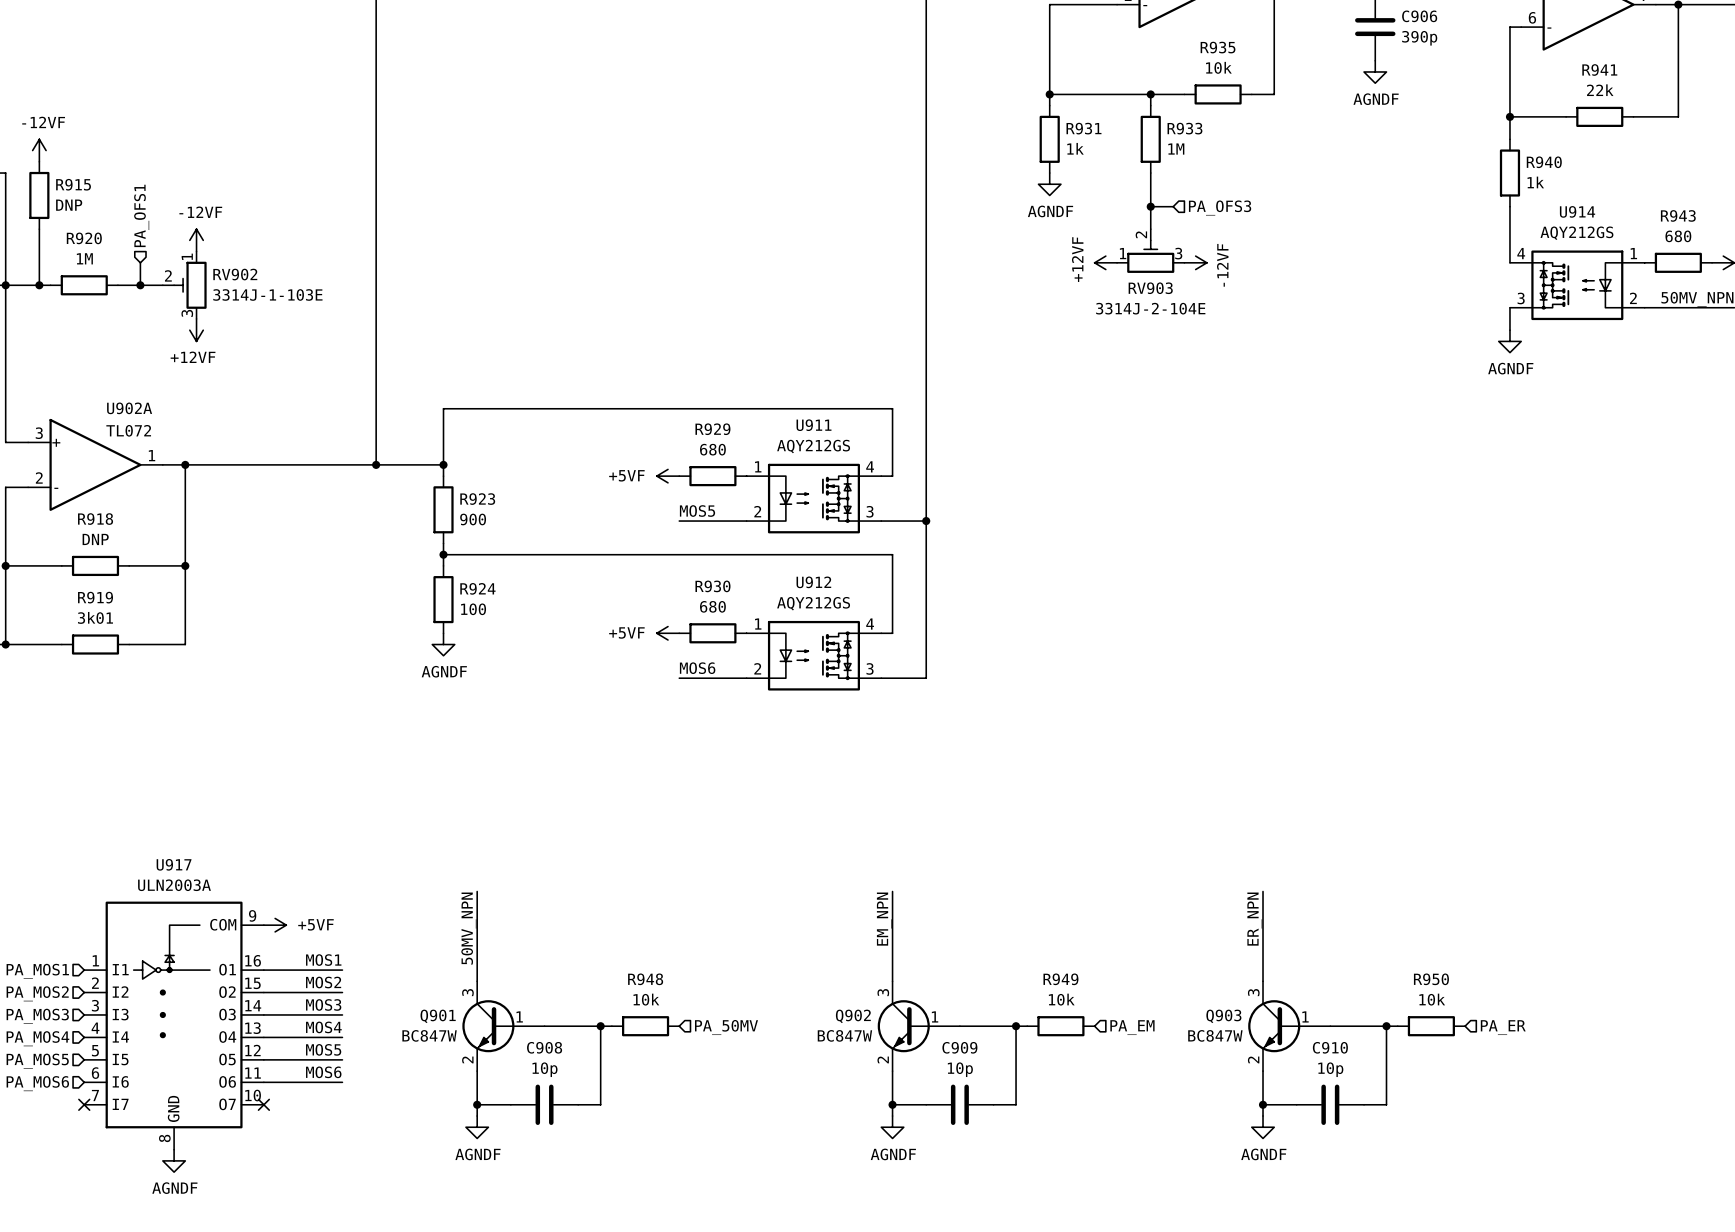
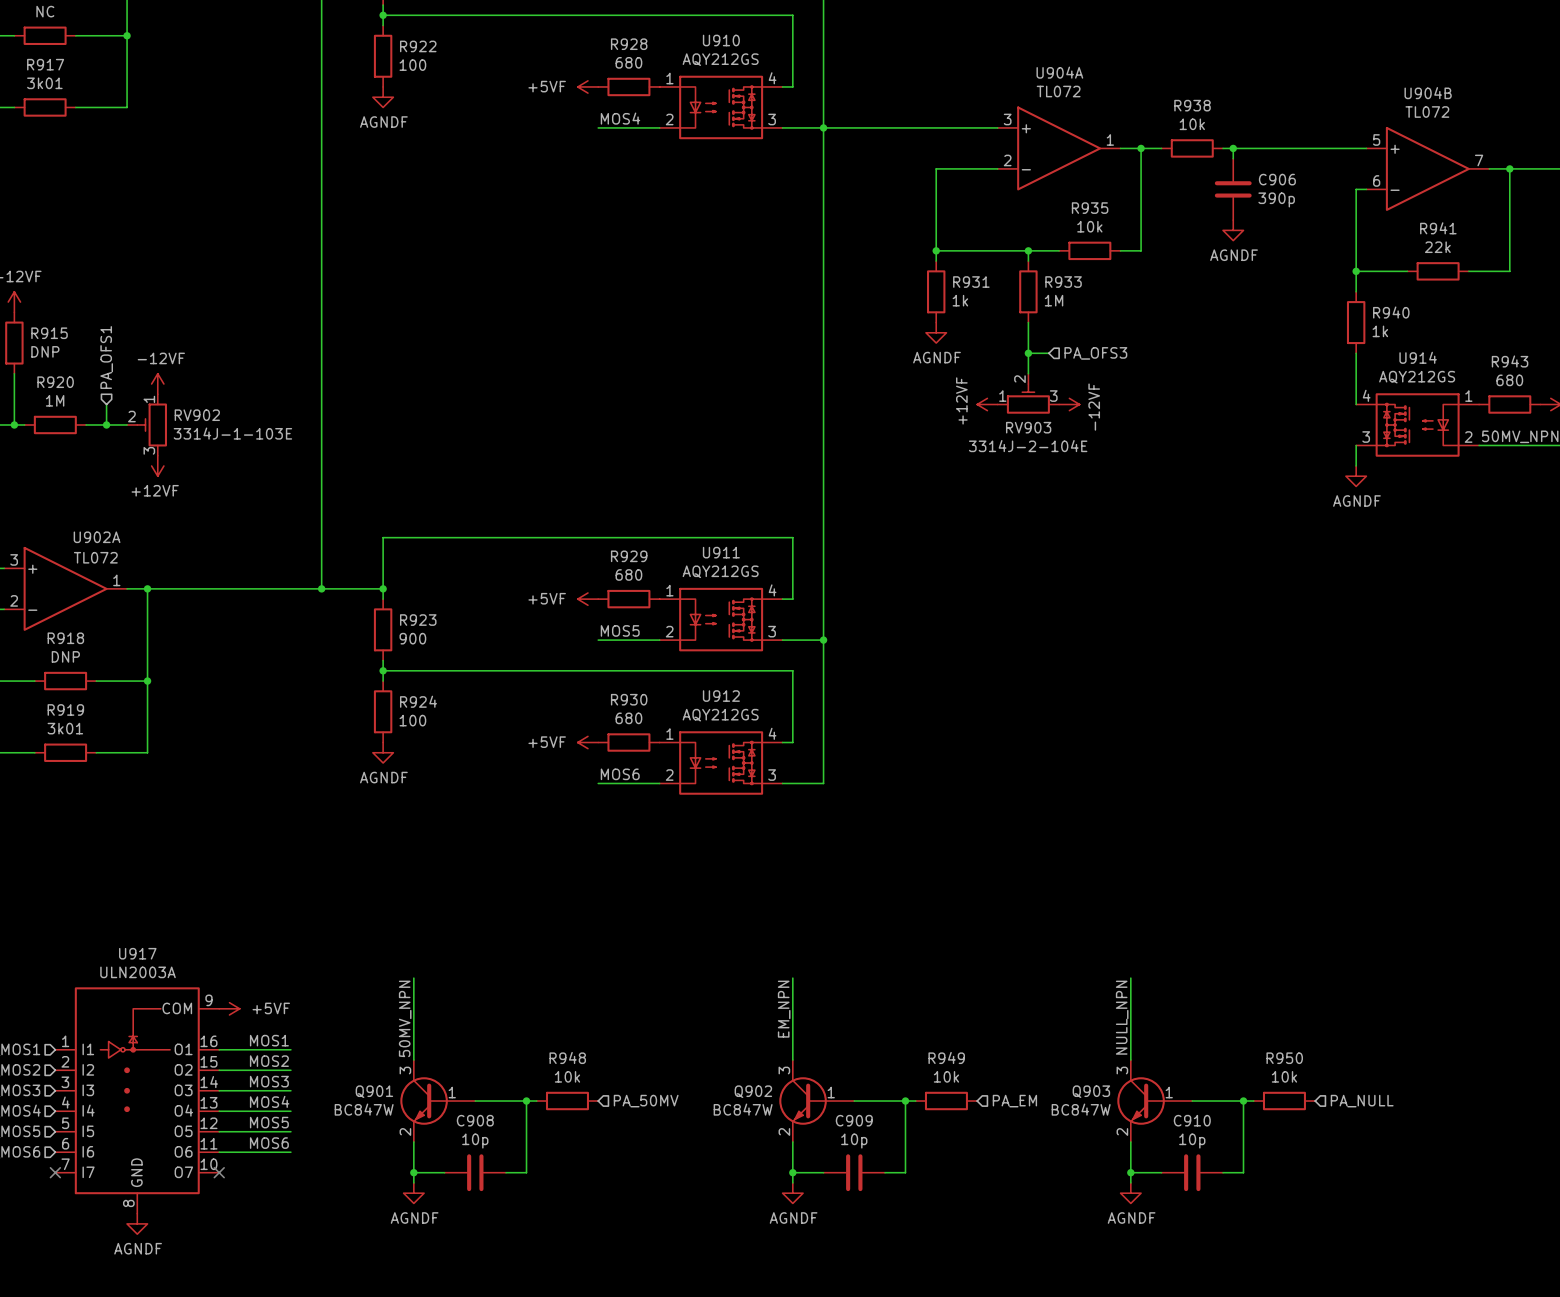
label: ER_NPN (1254, 919) -> NULL_NPN (1122, 1017)
hierarchical label: PA_ER (1503, 1027) -> PA_NULL (1362, 1101)

